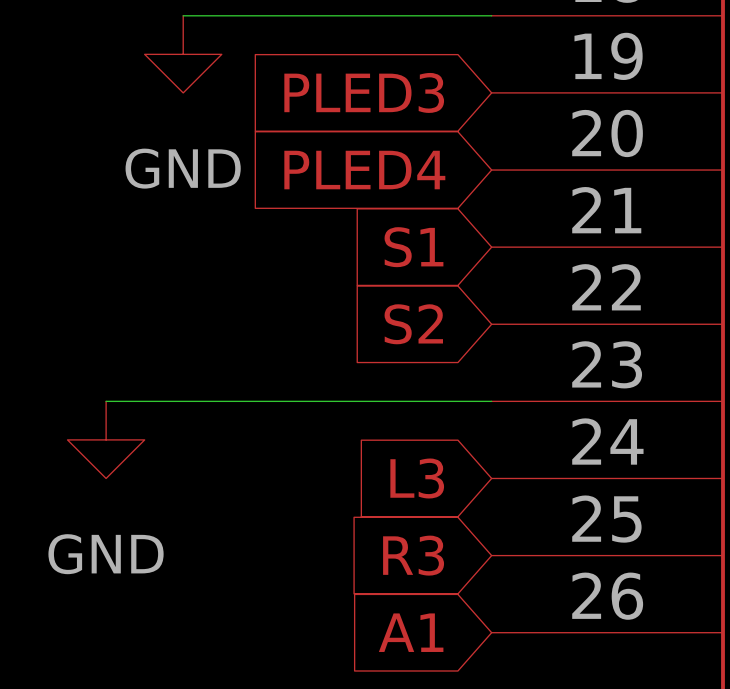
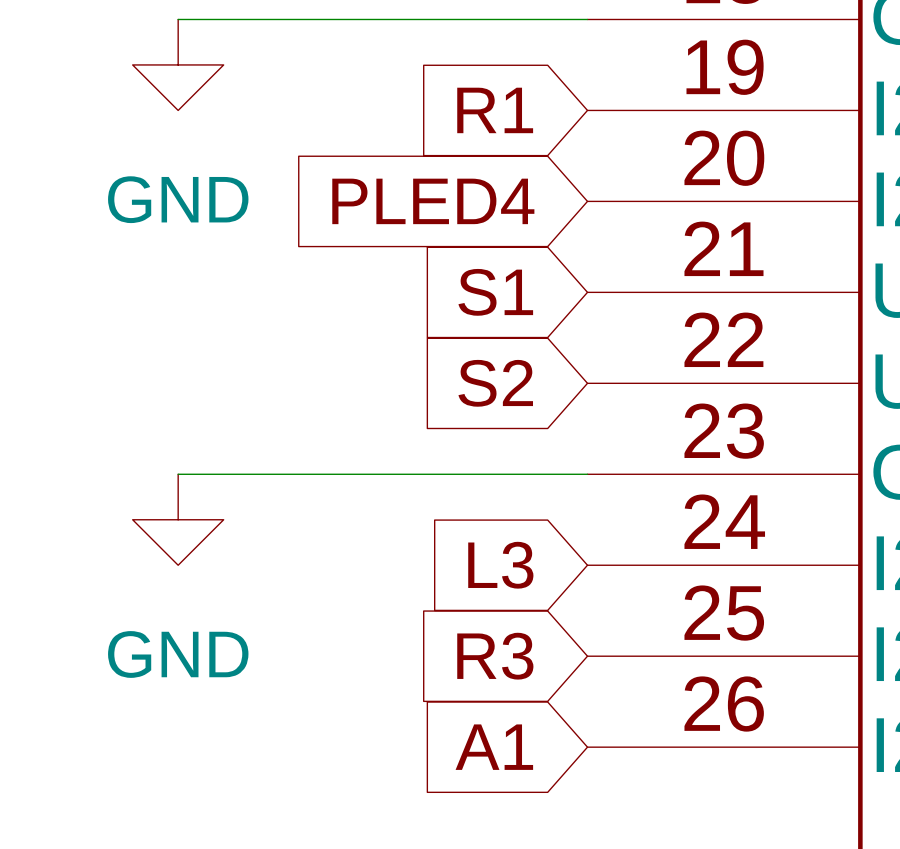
power symbol position: GND (183, 54) -> GND (178, 64)
global label: PLED3 (364, 92) -> R1 (495, 110)
wire: (106, 401) (144, 401) -> (178, 19) (223, 19)
power symbol position: GND (106, 439) -> GND (178, 519)

